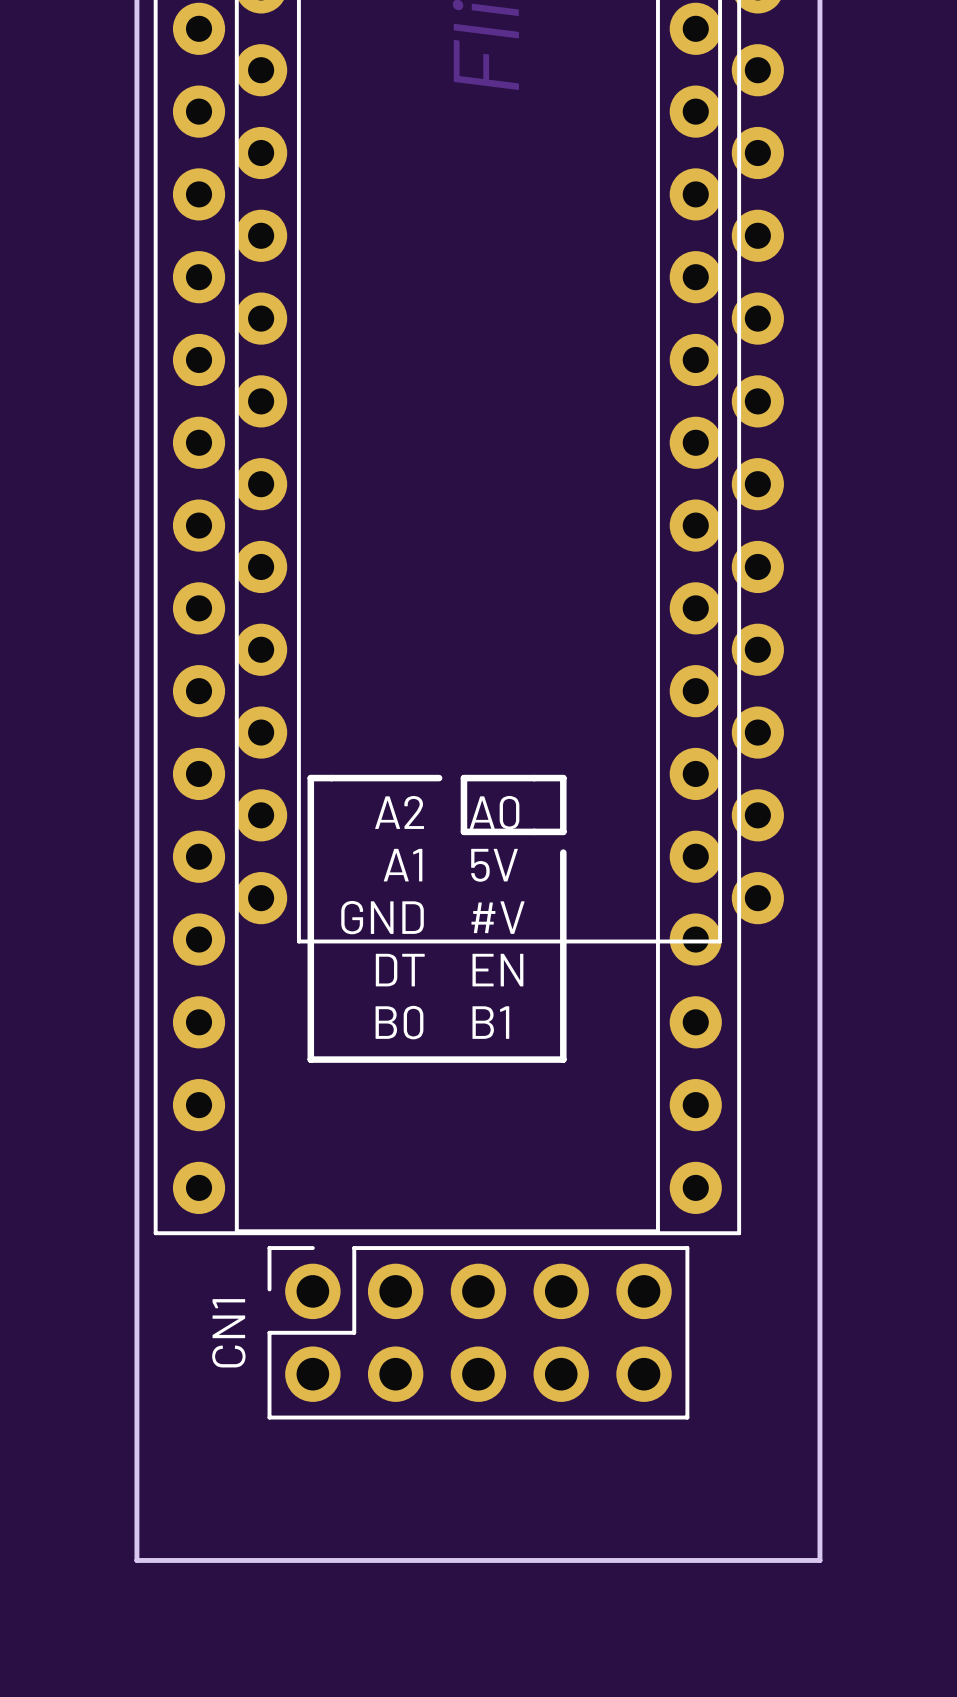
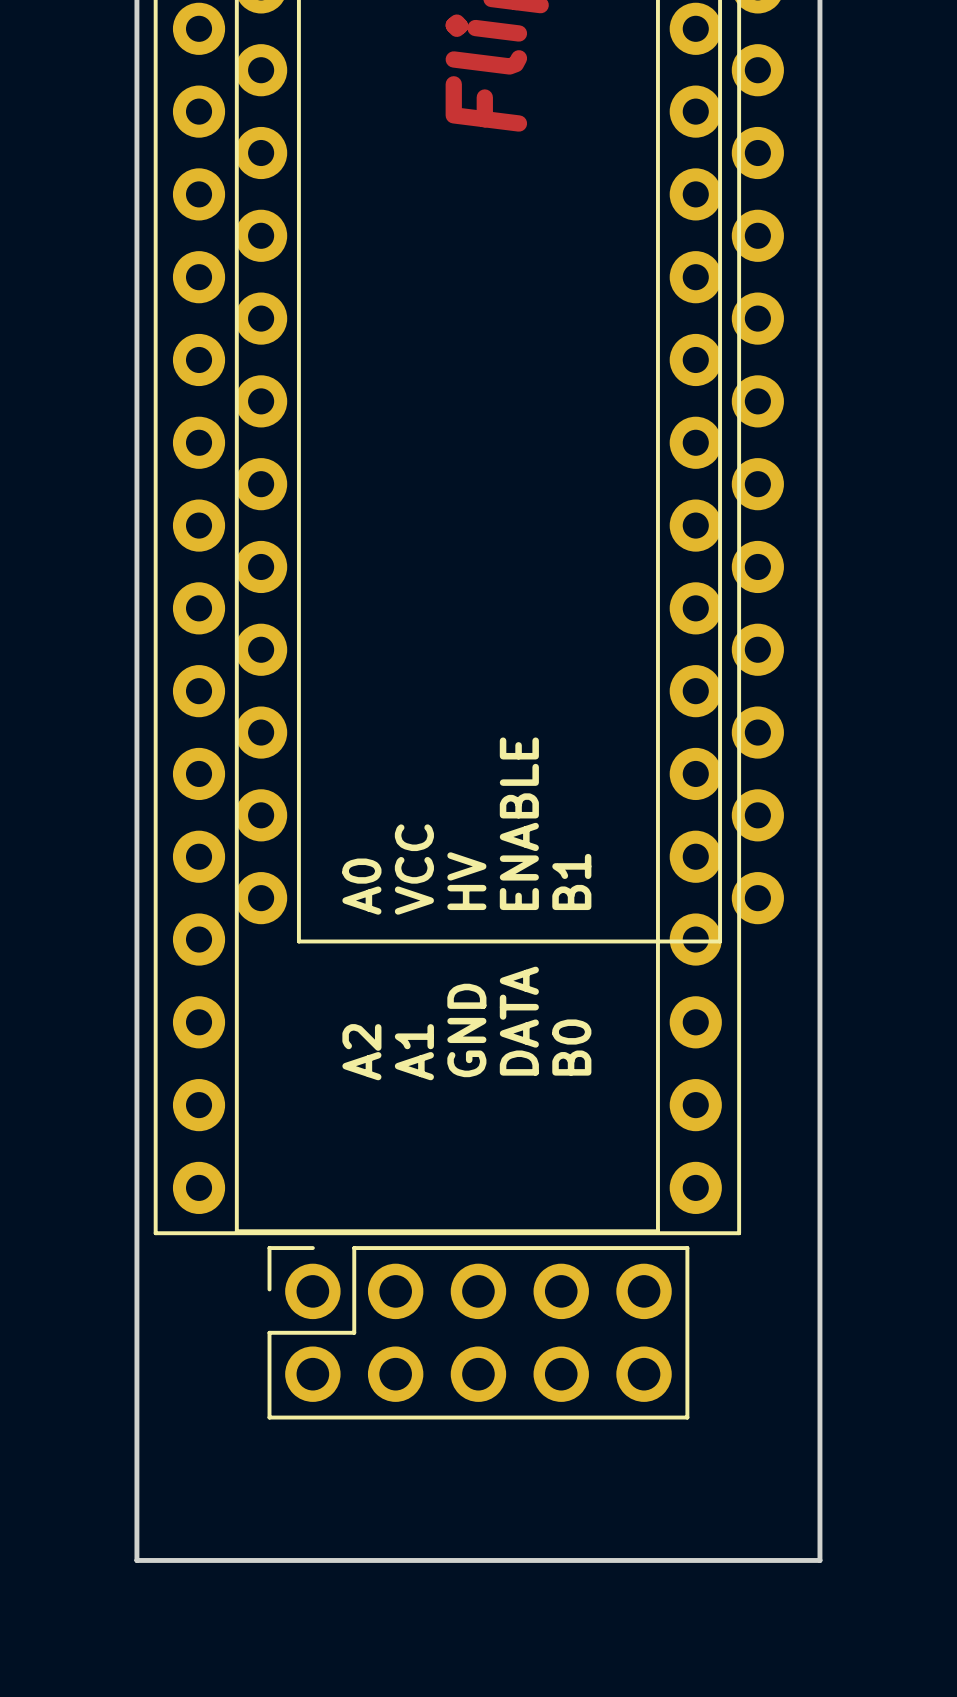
line: (439, 778) (310, 778) (310, 1059) (563, 1059) (563, 852) -> none
line: (463, 778) (563, 778) (563, 831) (463, 831) (463, 778) -> none
text rotation: 0° (399, 812) -> 90° counterclockwise (361, 1052)
text position: A2 (399, 812) -> A2 (361, 1052)
text rotation: 0° (494, 812) -> 90° counterclockwise (361, 886)
text position: A0 (494, 812) -> A0 (361, 886)
text: none -> ENABLE (519, 823)
text rotation: 0° (403, 865) -> 90° counterclockwise (414, 1052)
text position: A1 (403, 865) -> A1 (414, 1052)
text: 5V (494, 865) -> none
text: none -> VCC (414, 869)
text rotation: 0° (382, 917) -> 90° counterclockwise (466, 1030)
text position: GND (382, 917) -> GND (466, 1030)
text: #V (498, 917) -> HV (466, 881)
text: DT (400, 970) -> none
text: EN (497, 970) -> none
text rotation: 0° (399, 1022) -> 90° counterclockwise (571, 1047)
text position: B0 (399, 1022) -> B0 (571, 1047)
text rotation: 0° (490, 1022) -> 90° counterclockwise (571, 881)
text position: B1 (490, 1022) -> B1 (571, 881)
text: none -> DATA (519, 1021)
CN1 name: CN1 (228, 1333) -> none

